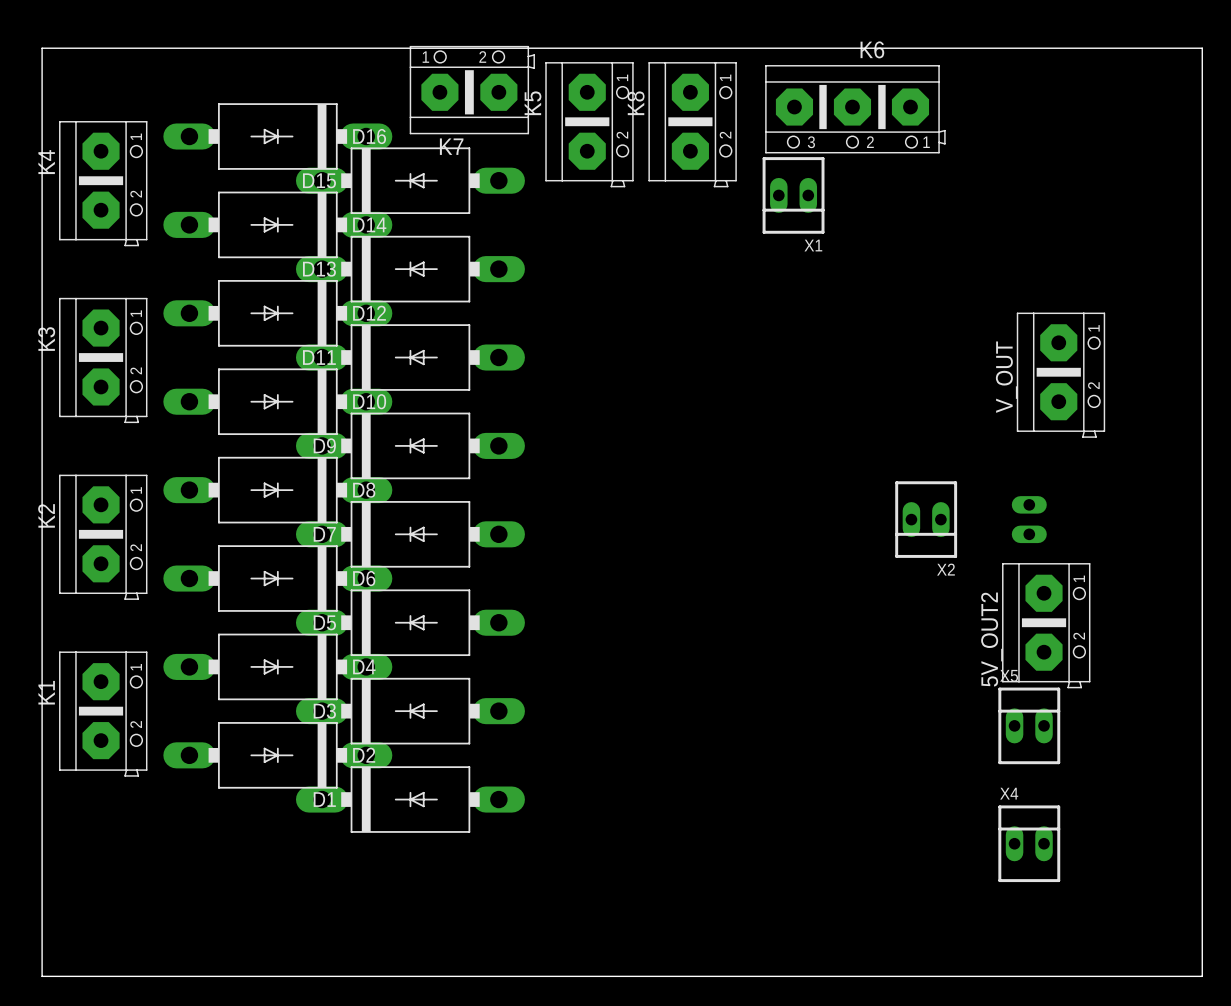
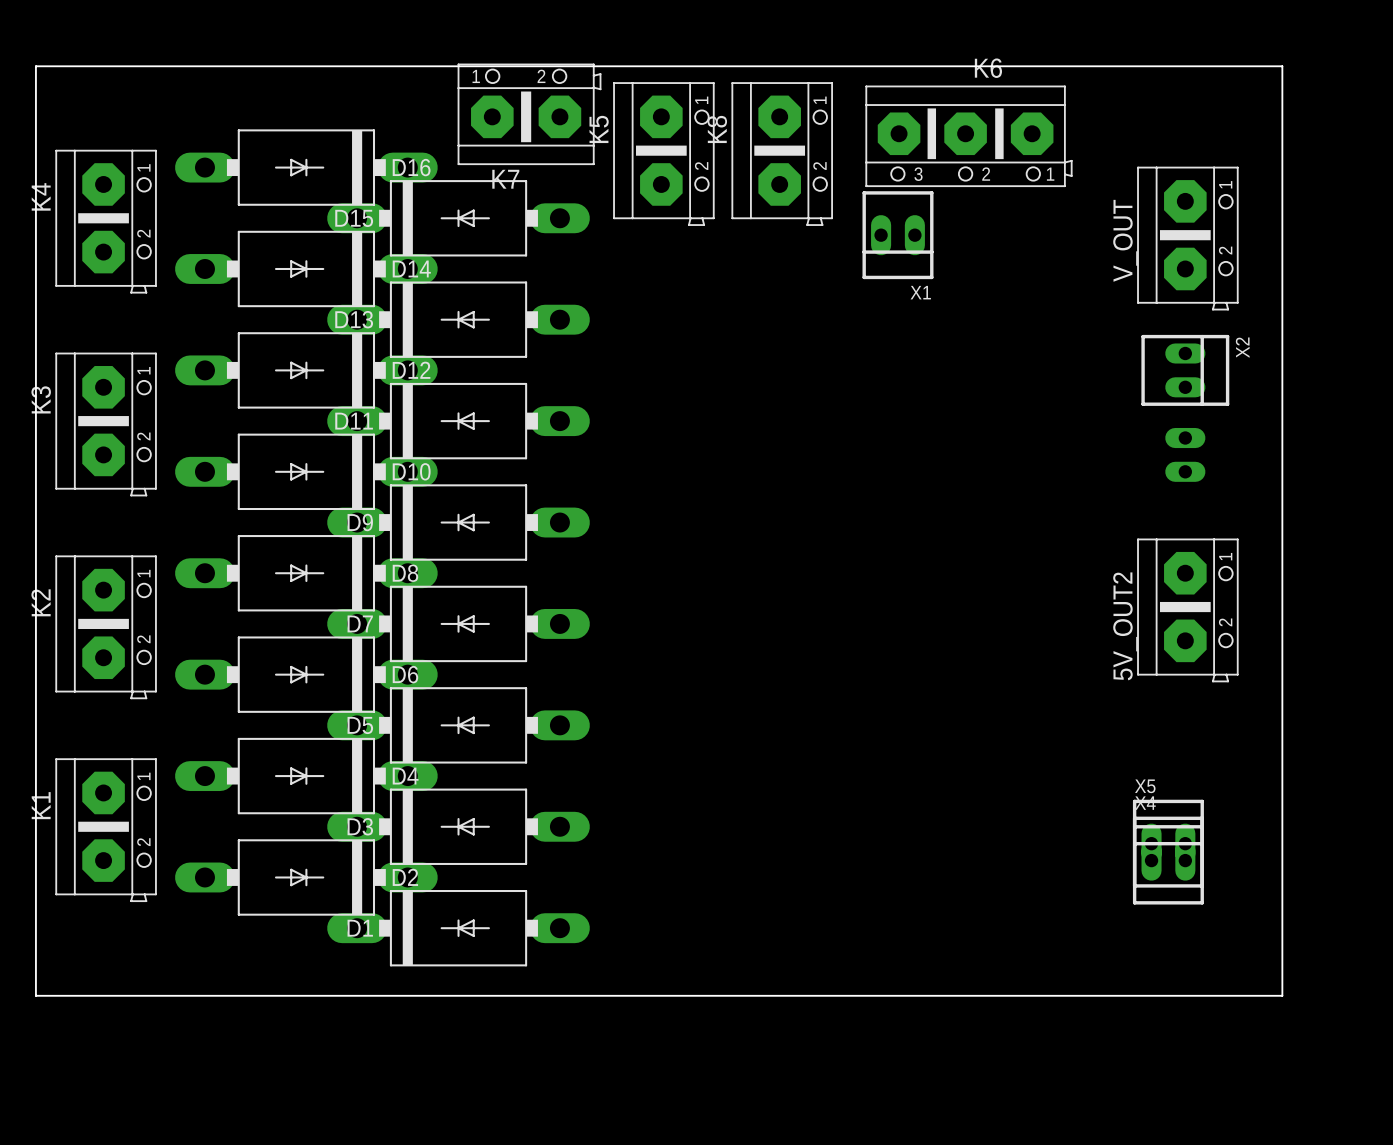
board edge: (1128, 48) (1202, 48) (1202, 976) (42, 976) (42, 858) -> (1282, 66) (1282, 995) (35, 995)
V_OUT position: (1060, 375) -> (1187, 238)
X2 rotation: 0° (926, 519) -> 90° counterclockwise (1185, 370)
X2 position: (926, 519) -> (1185, 370)
part position: (1029, 519) -> (1185, 454)
5V_OUT2 position: (1046, 625) -> (1187, 610)
X4 position: (1029, 843) -> (1168, 860)

